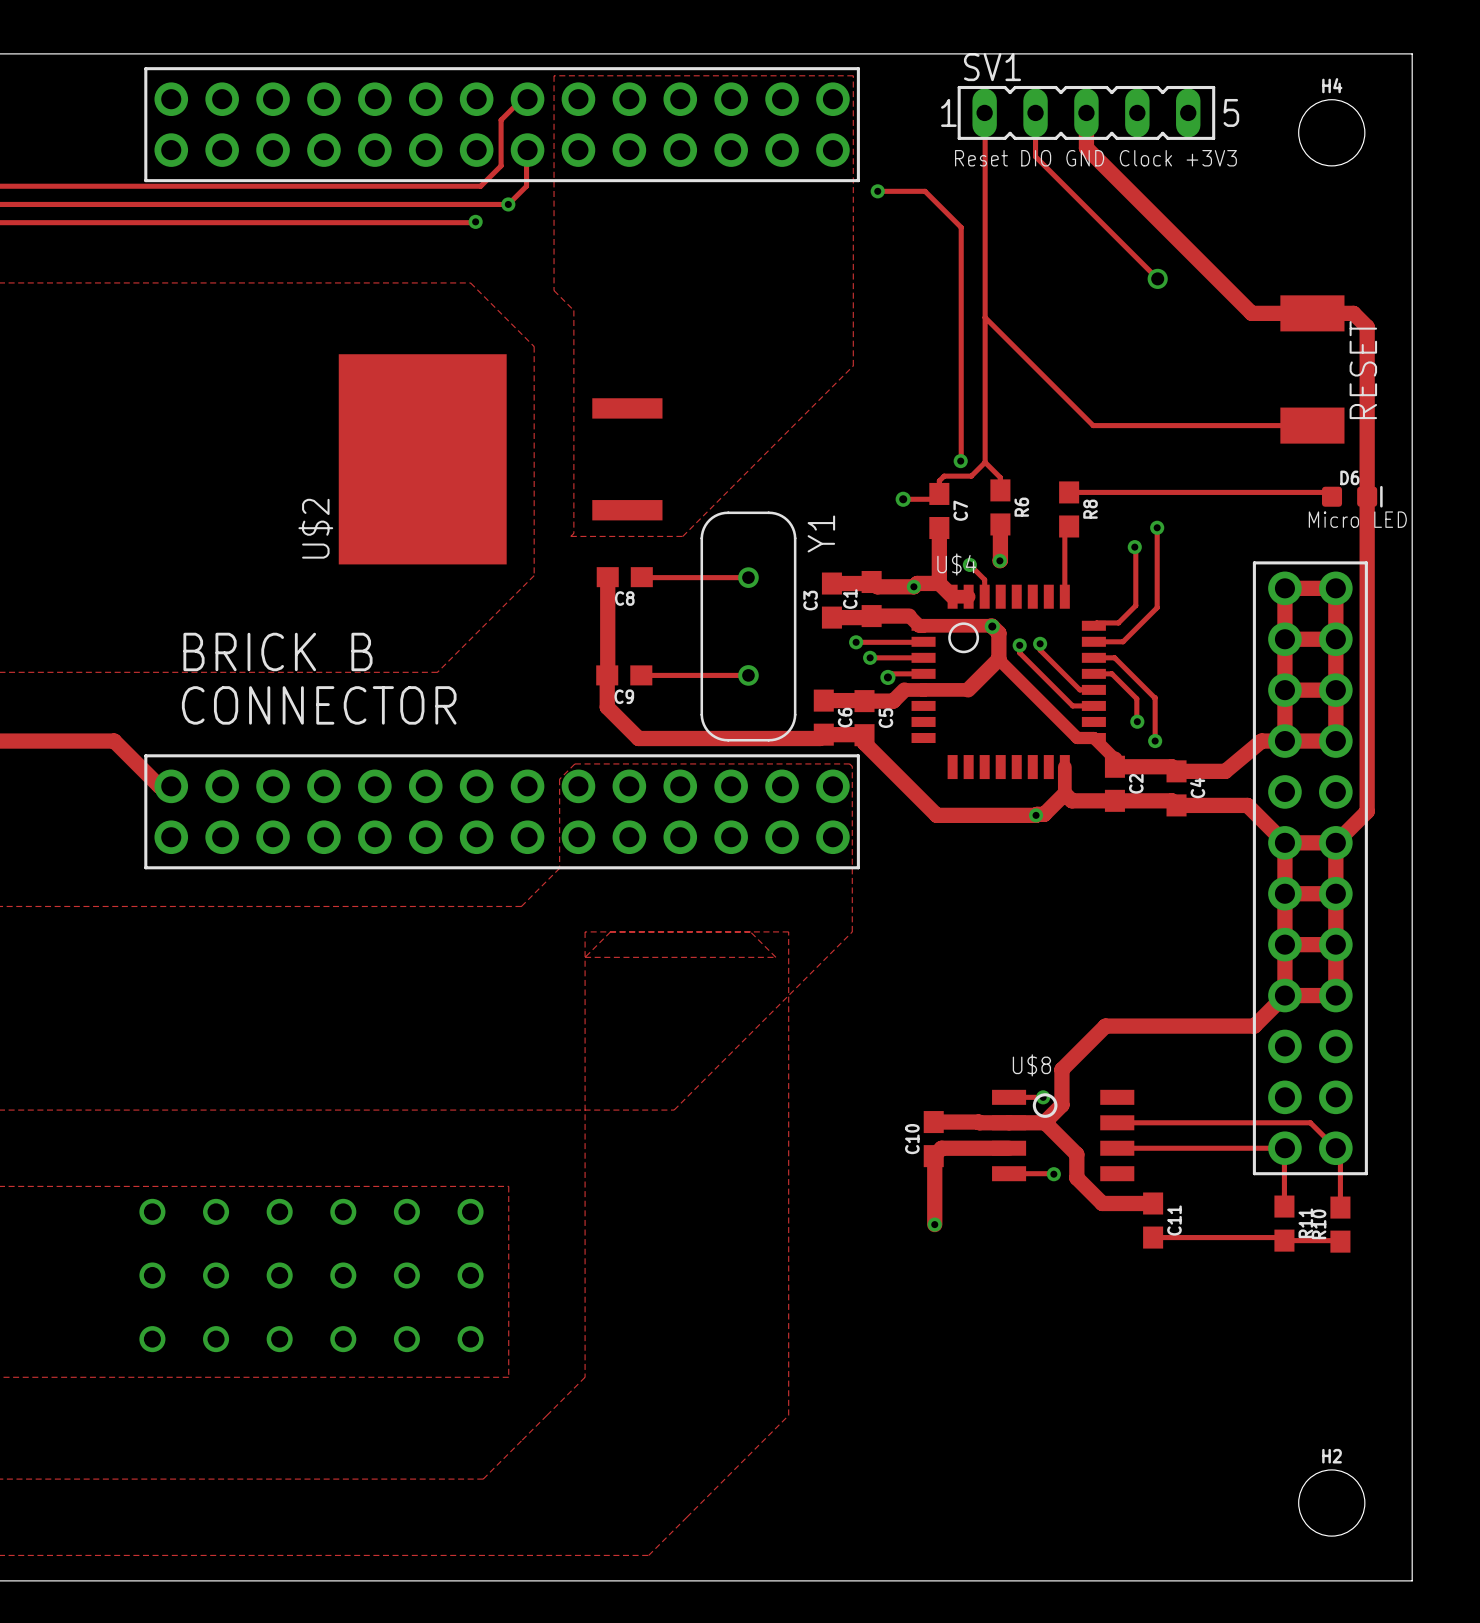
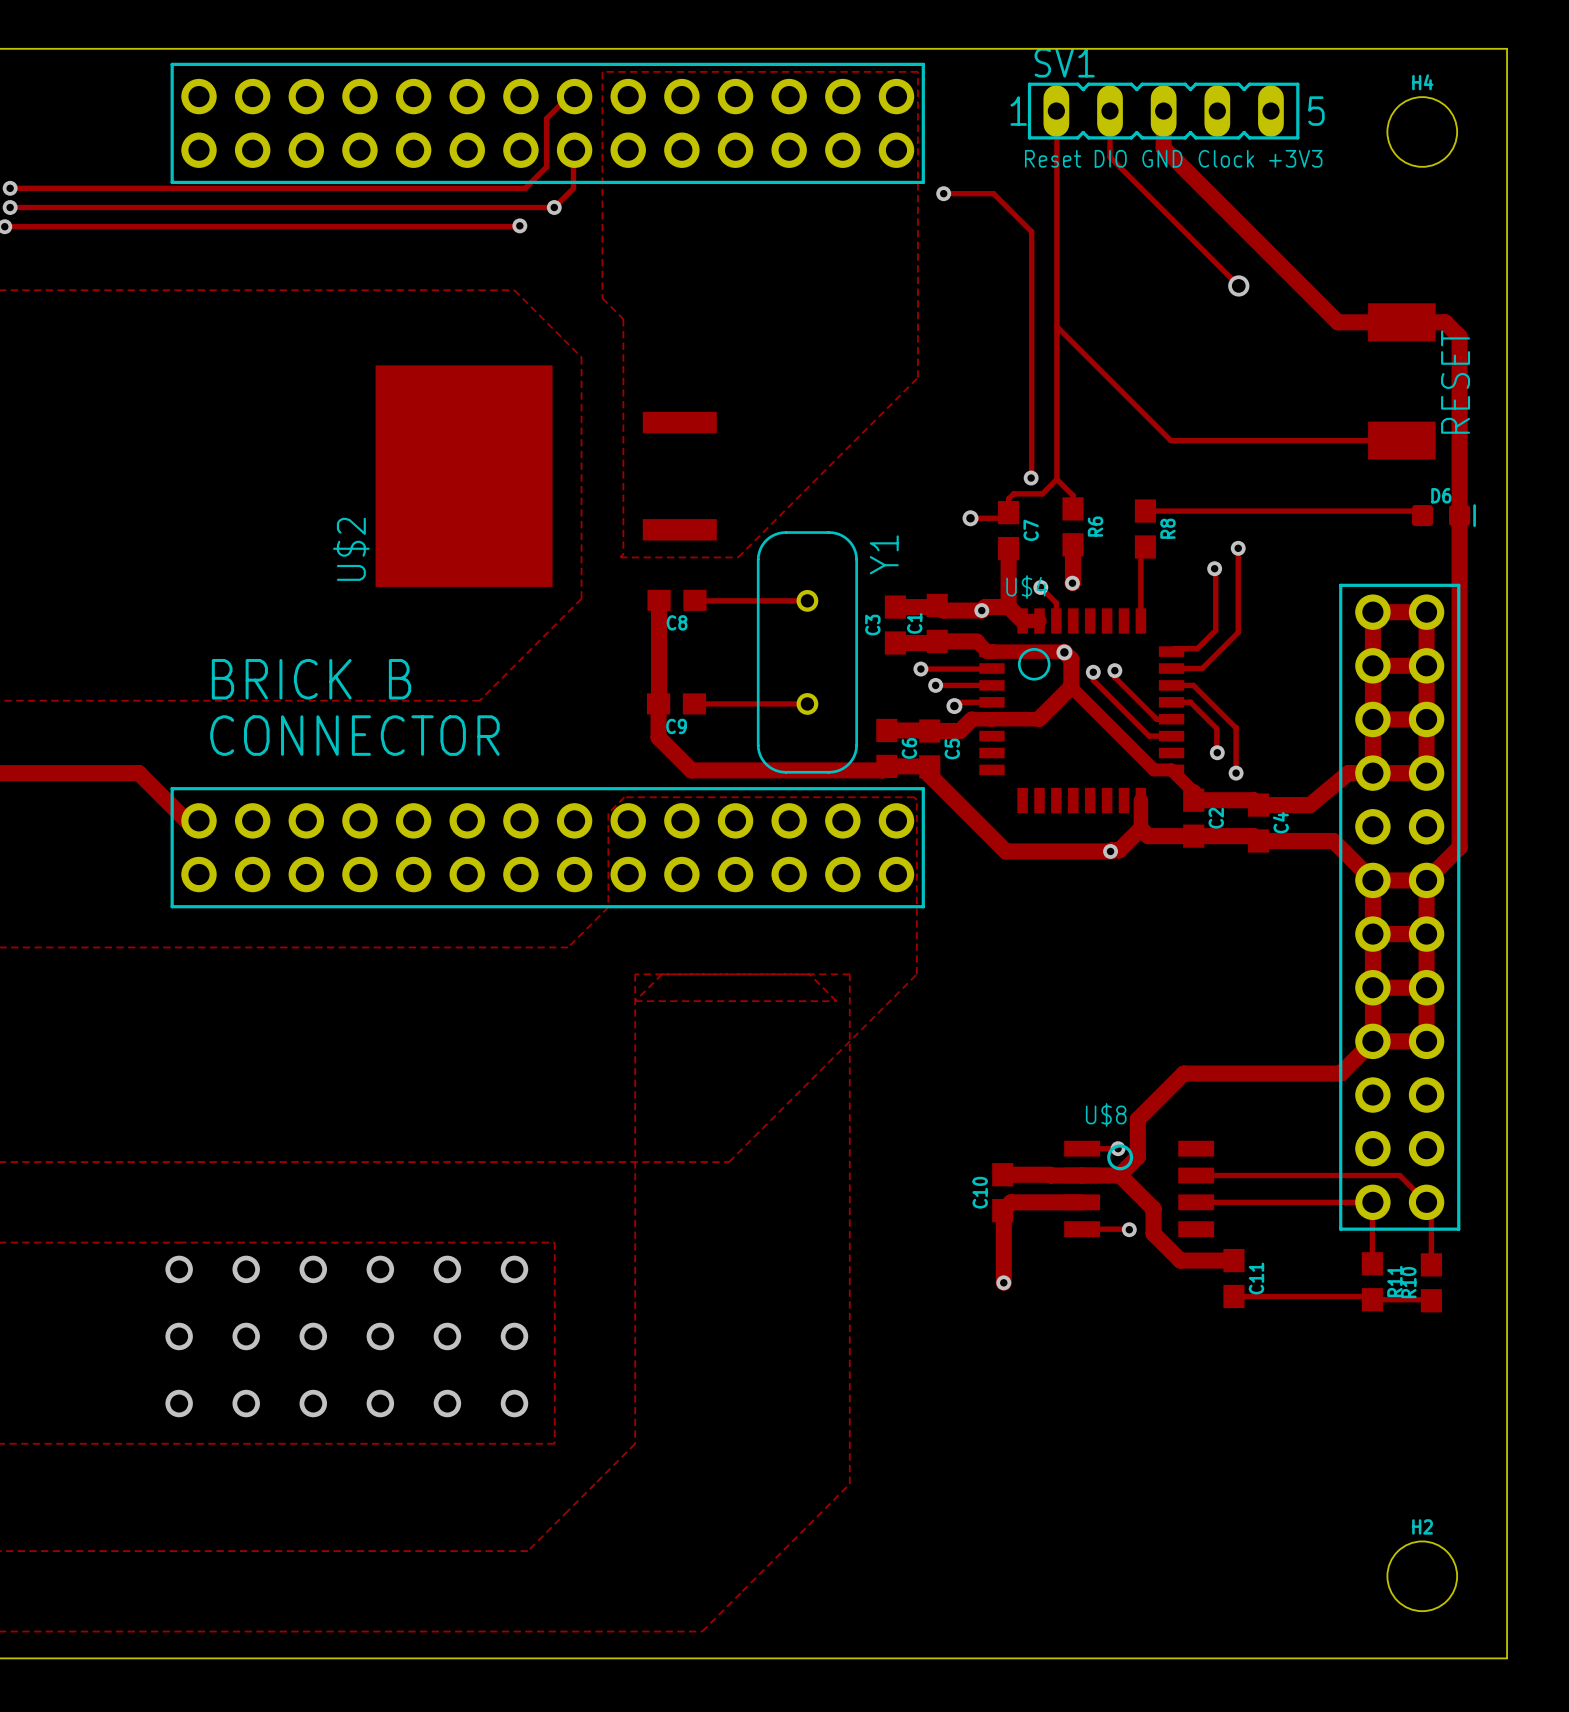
text: Micro LED (1357, 519) -> none

